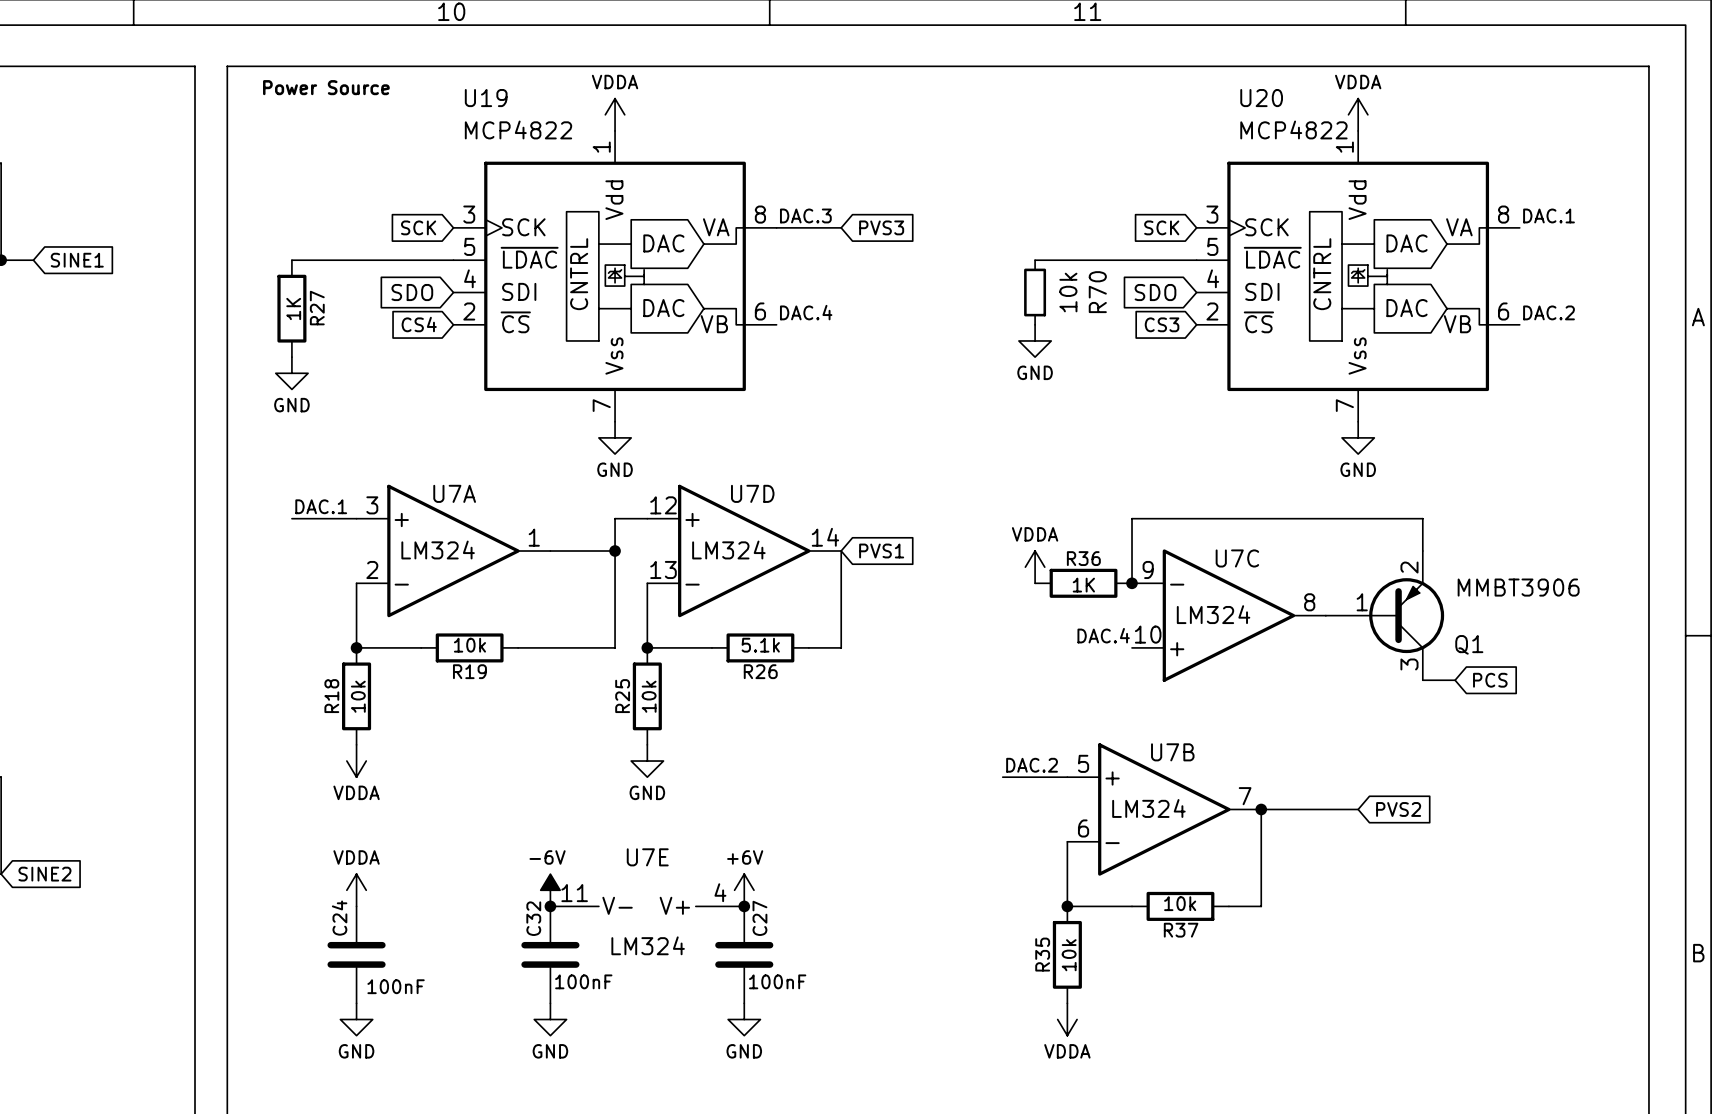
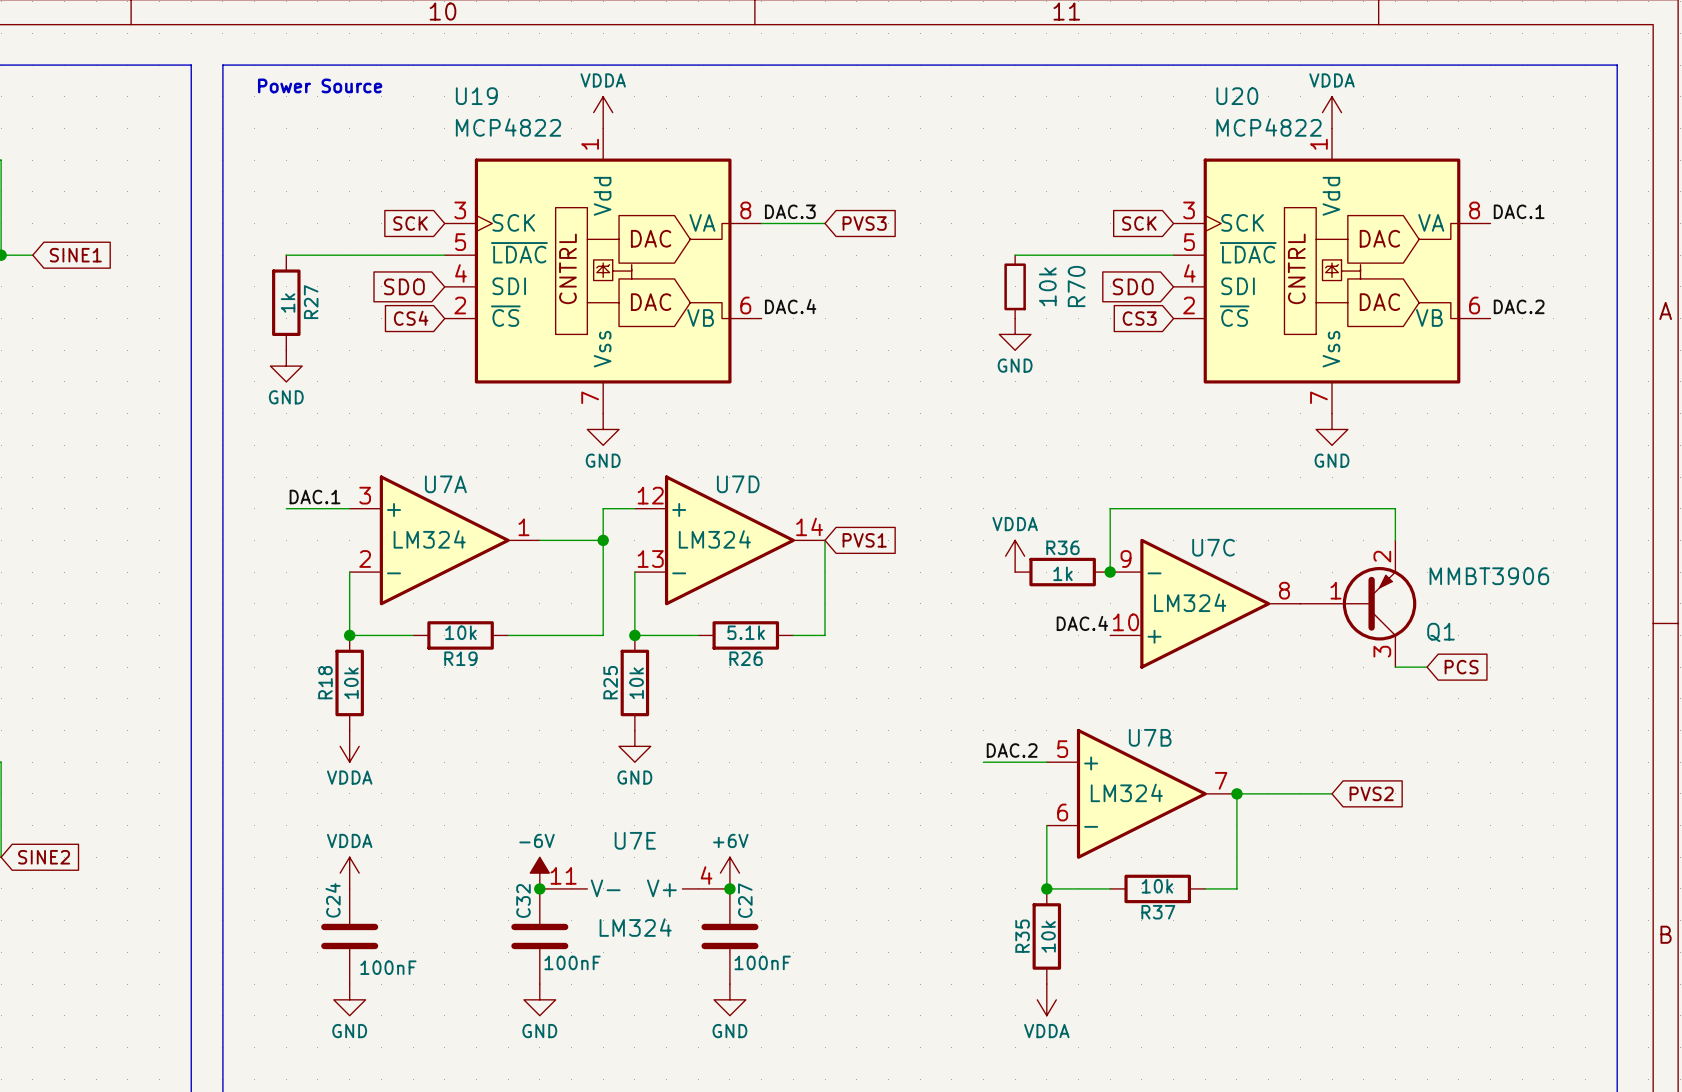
R27 value: 1K (293, 308) -> 1k (288, 303)
R36 value: 1K (1083, 585) -> 1k (1062, 573)

